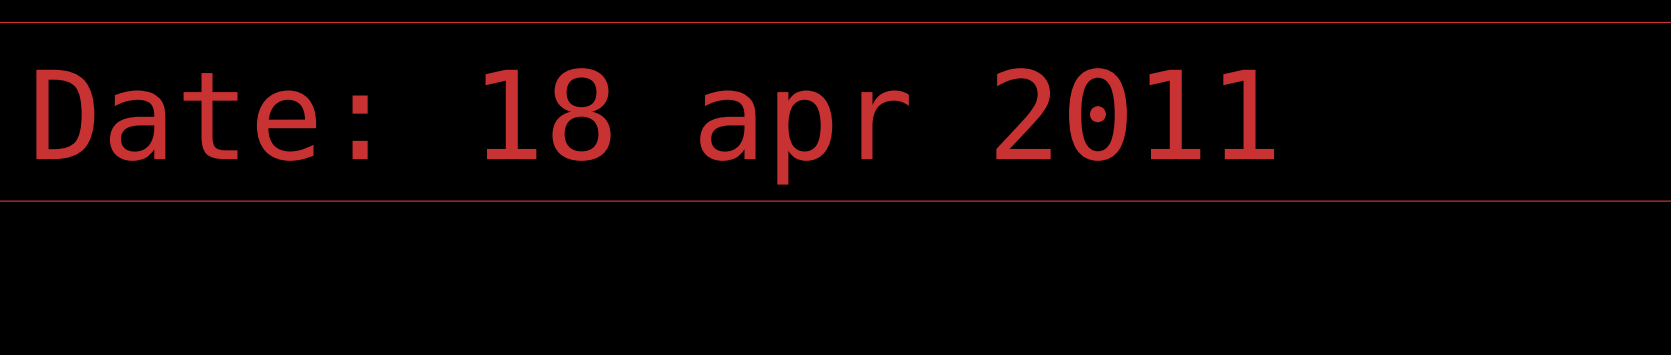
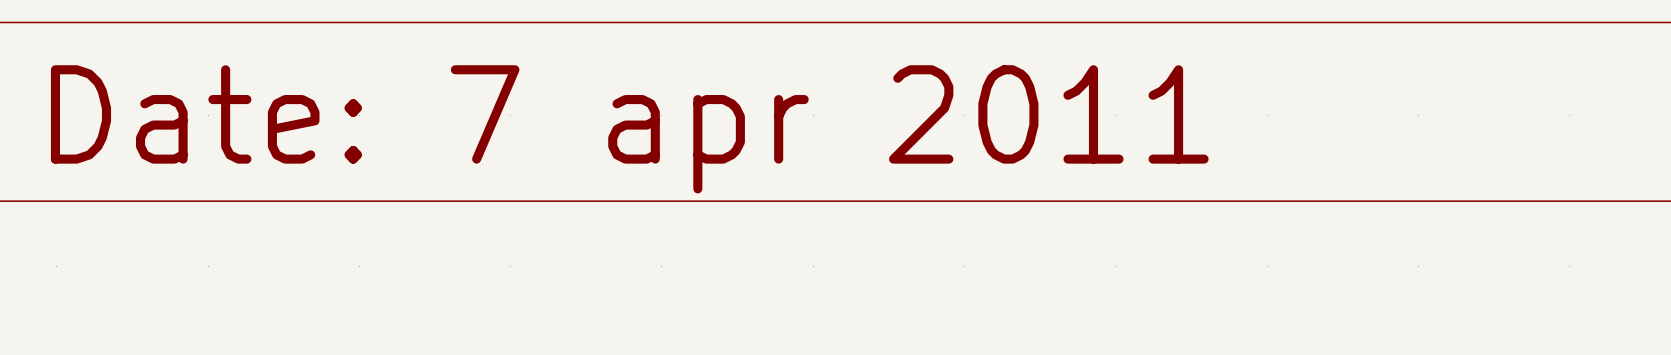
title block: Date: 18 apr 2011 (655, 126) -> Date: 7 apr 2011 (629, 129)

